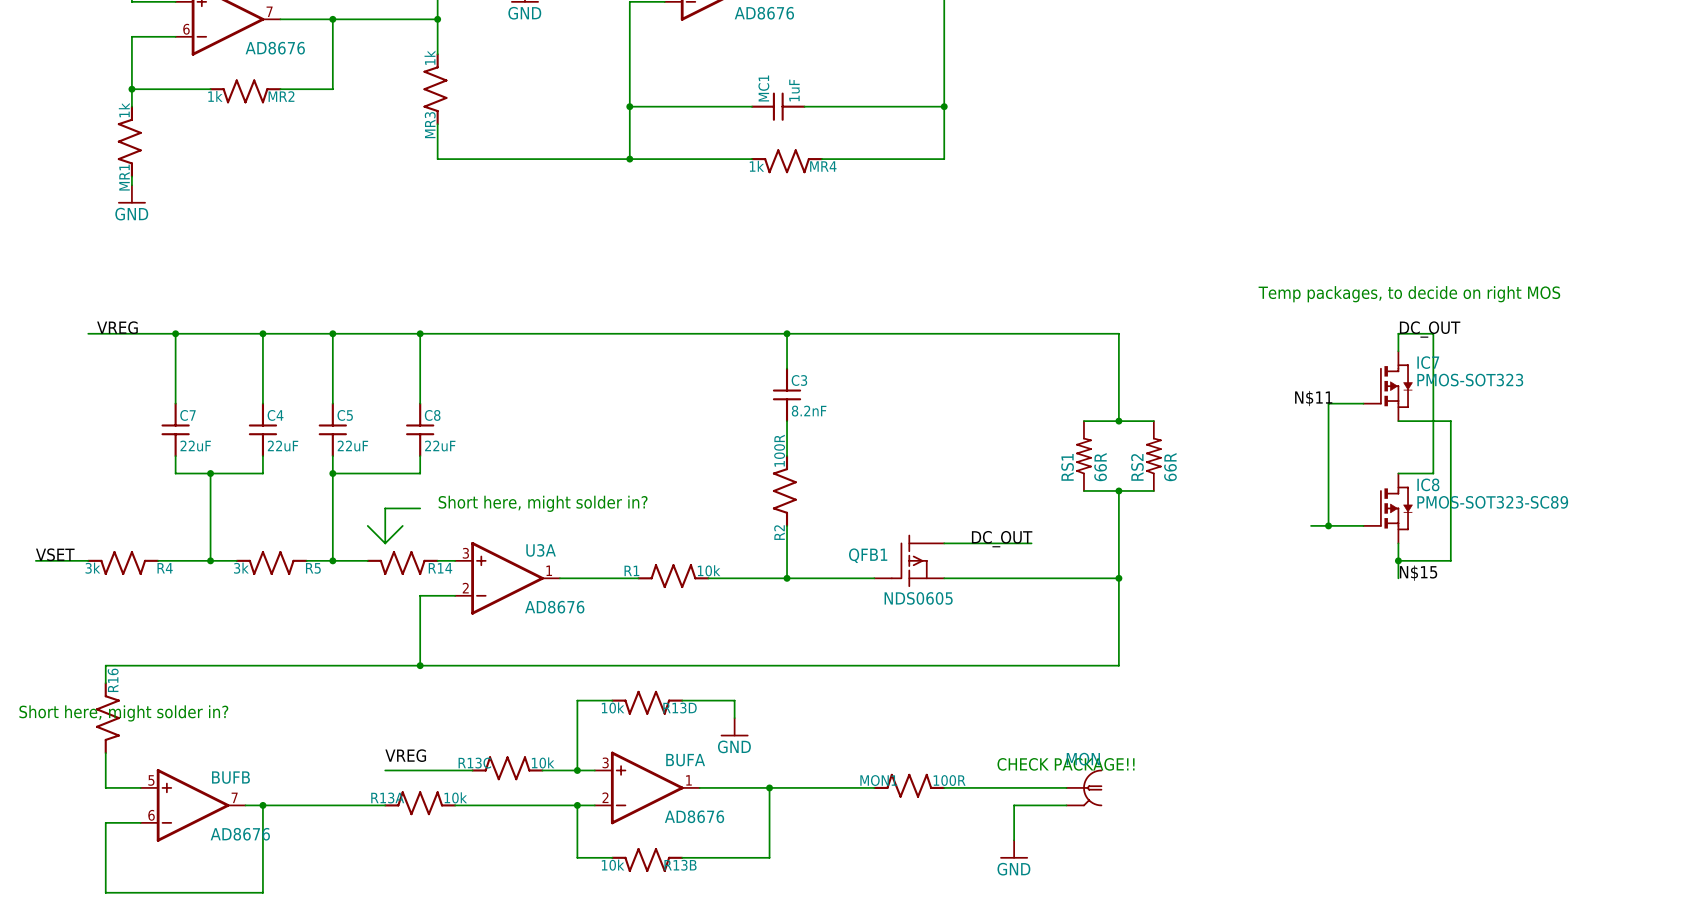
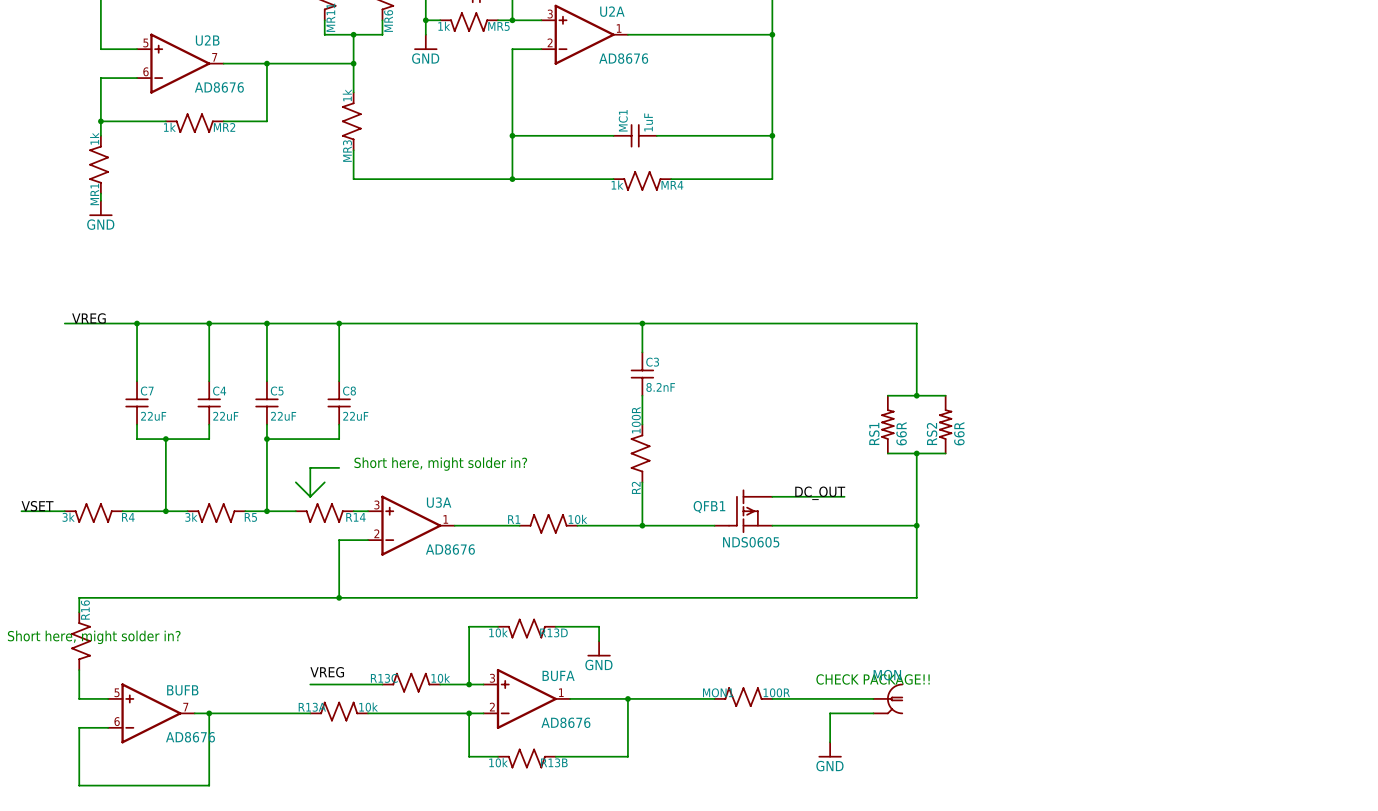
text: Temp packages, to decide on right MOS (1409, 294) -> none
label: DC_OUT (1430, 329) -> none
wire: (1398, 351) (1398, 333) (1433, 333) (1433, 473) (1398, 473) -> none
IC7: PMOS-SOT323 (1388, 386) -> none
label: N$11 (1313, 398) -> none
wire: (1363, 403) (1328, 403) (1328, 525) -> none
wire: (1398, 421) (1450, 421) (1450, 560) (1398, 560) -> none
IC8: PMOS-SOT323-SC89 (1388, 508) -> none
wire: (1311, 525) (1363, 525) -> none
junction: (1328, 525) -> none
wire: (1398, 543) (1398, 578) -> none
junction: (1398, 560) -> none
label: N$15 (1418, 573) -> none

